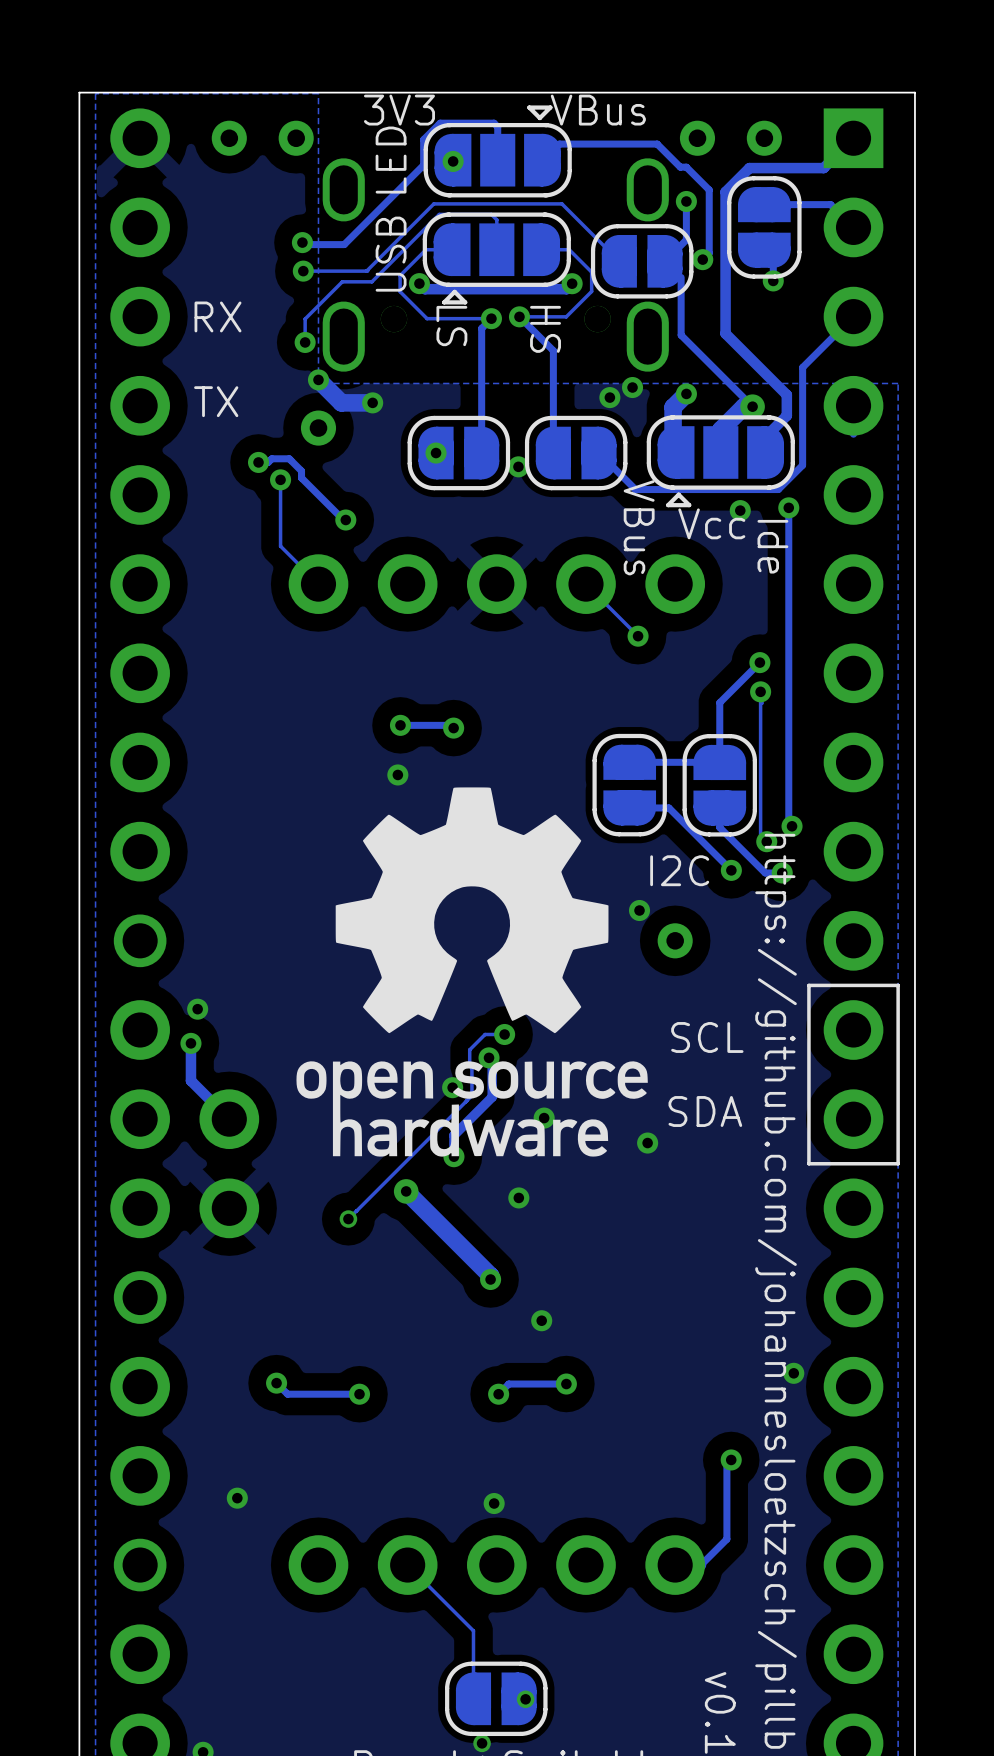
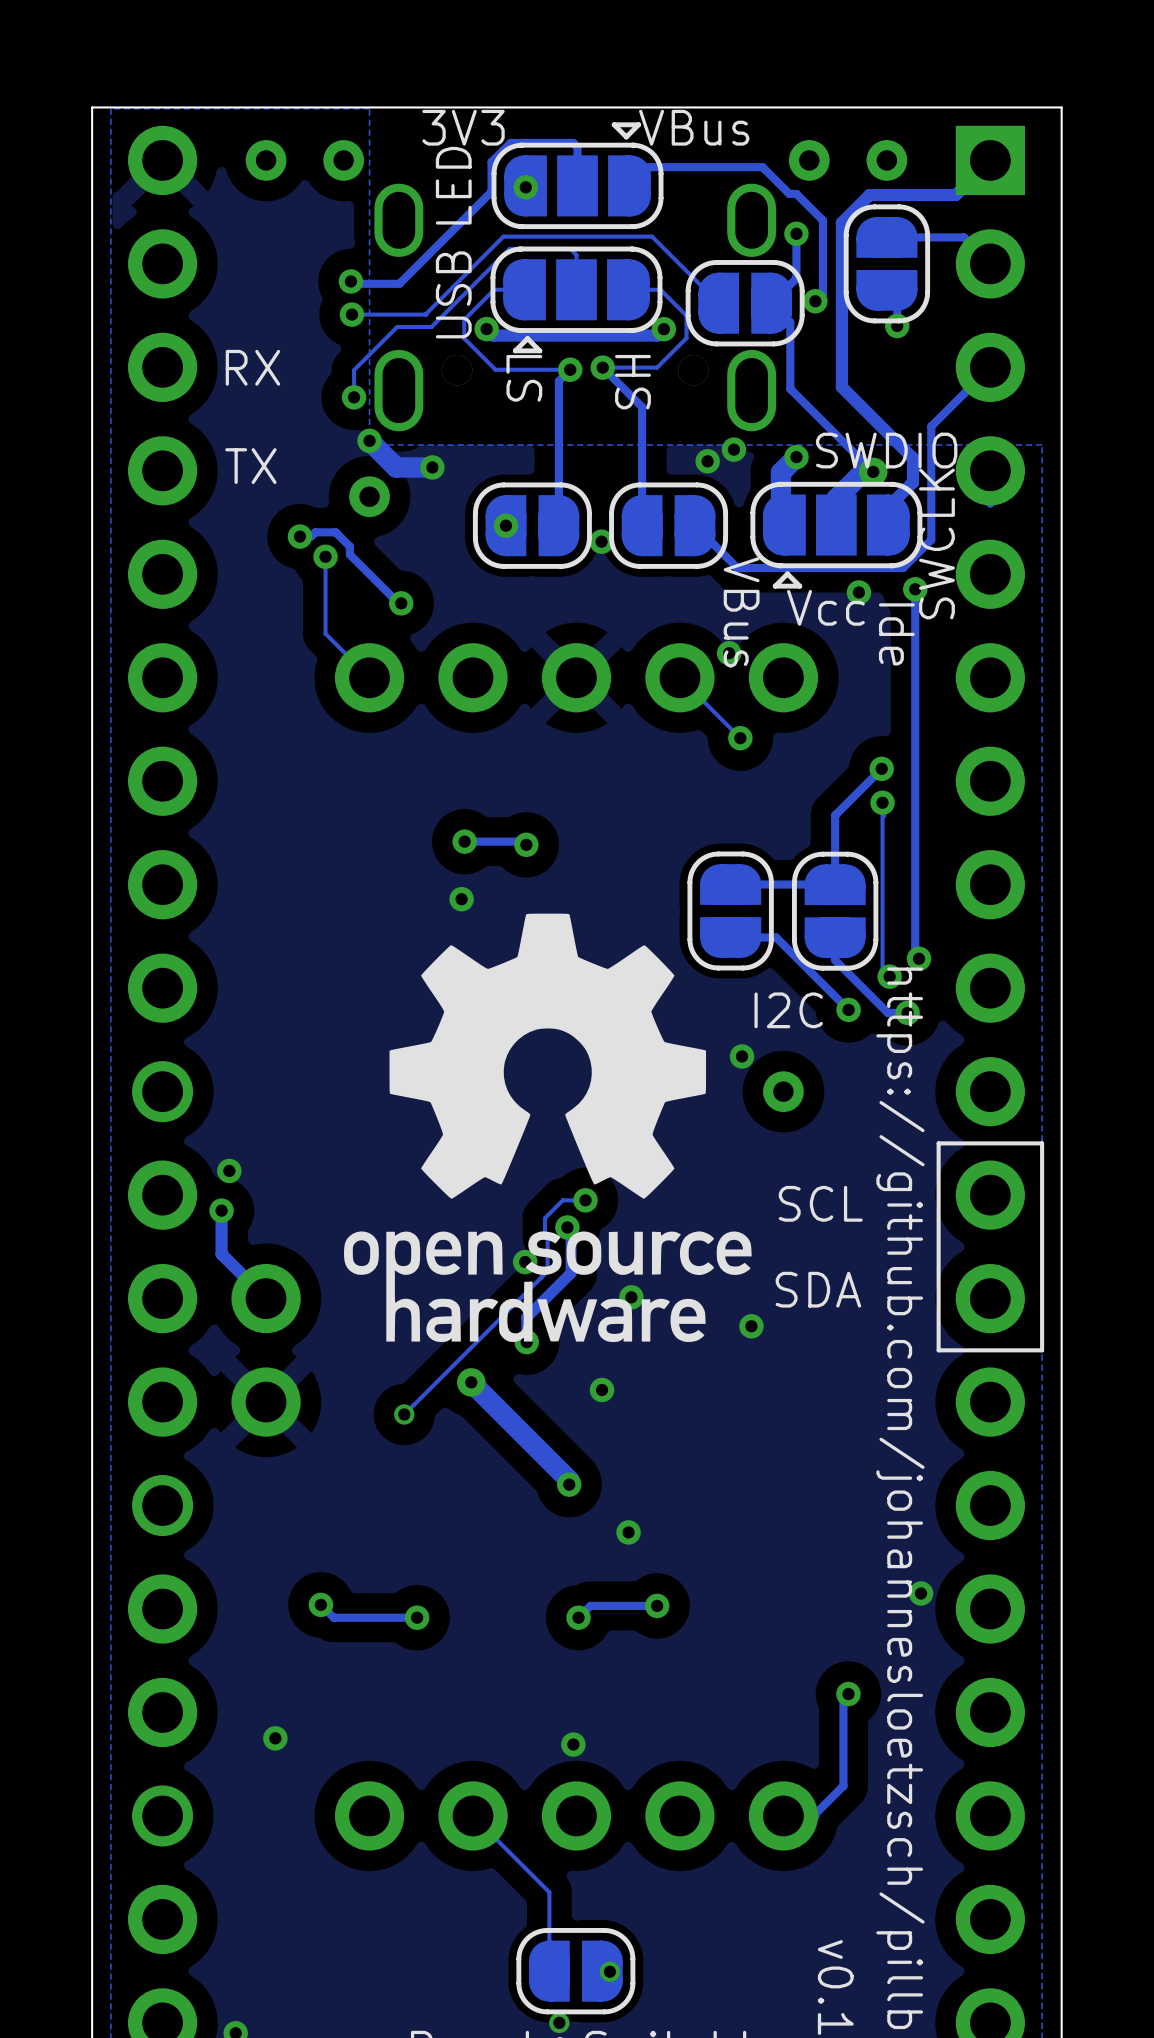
text: none -> SWDIO (886, 450)
text: none -> SWCLK (936, 543)
via: none -> (729, 653)

